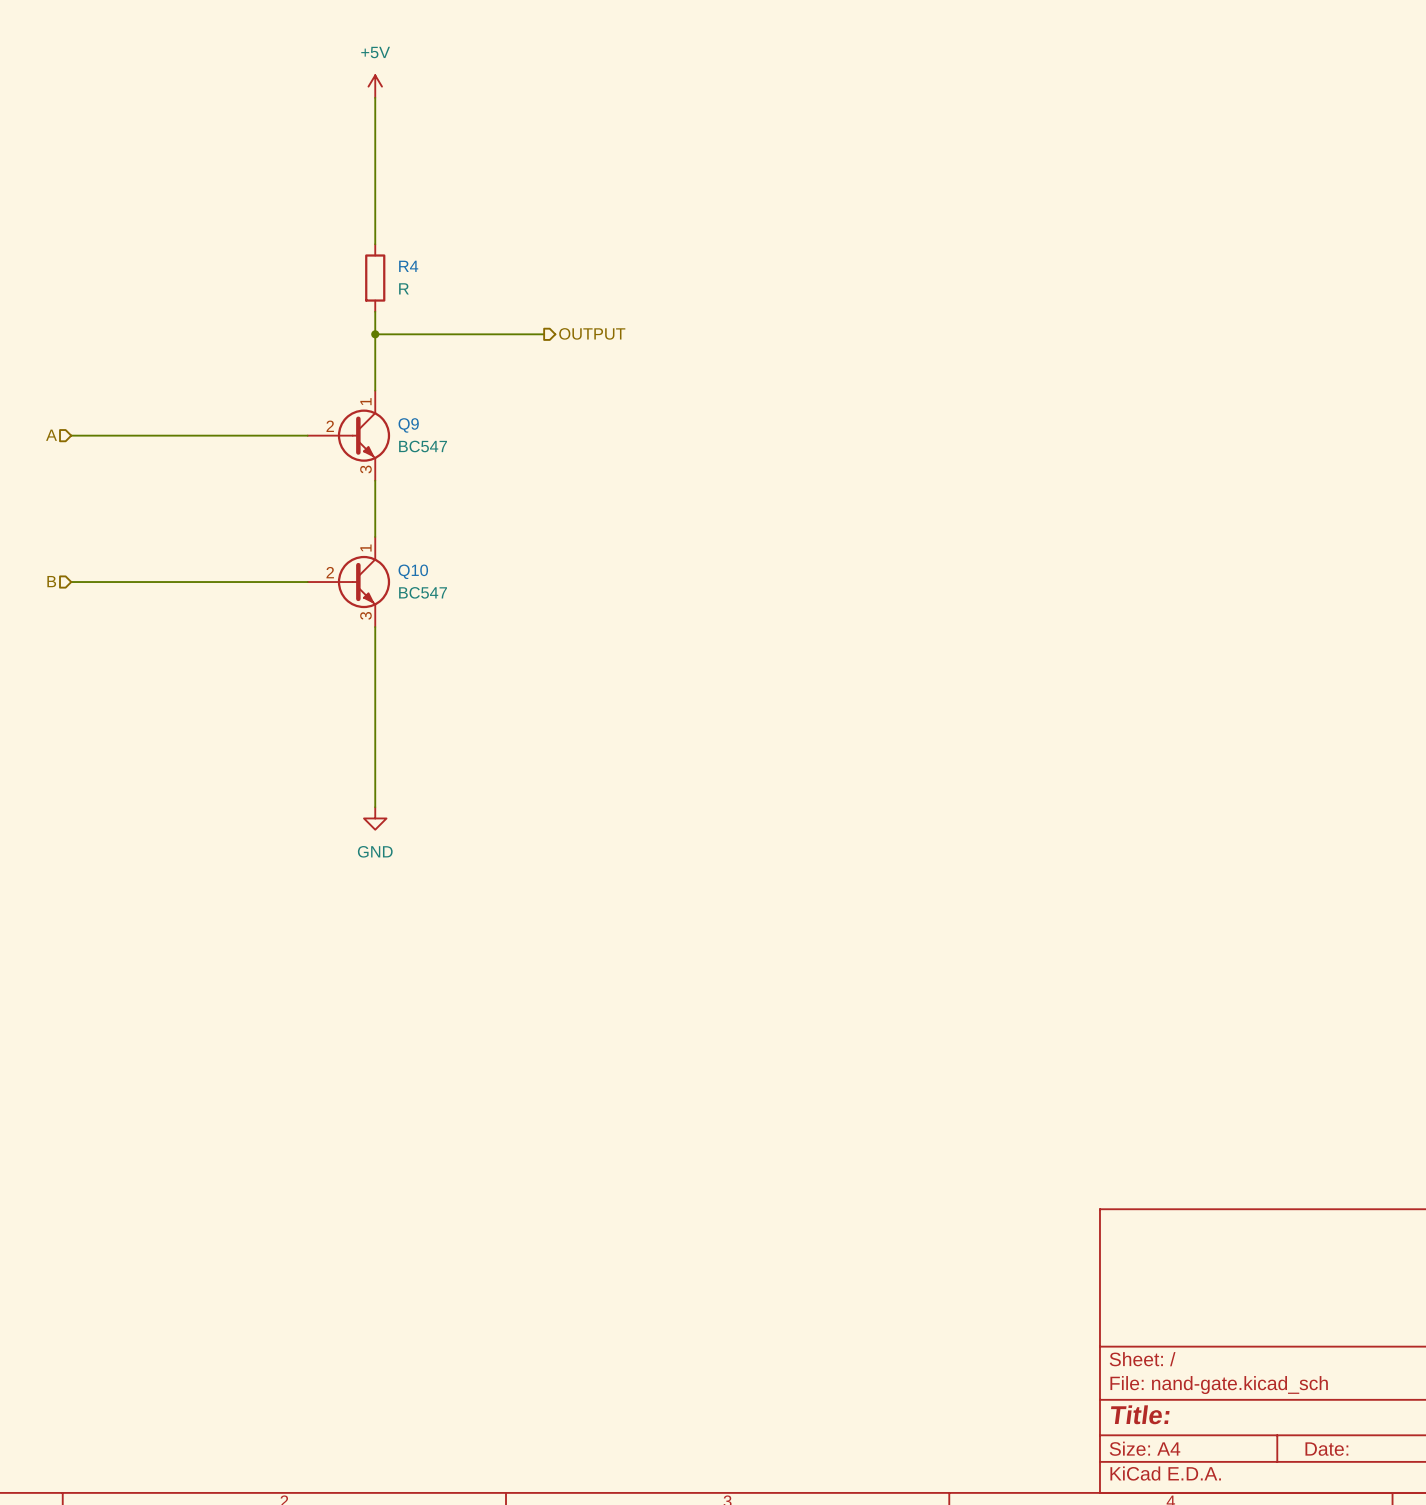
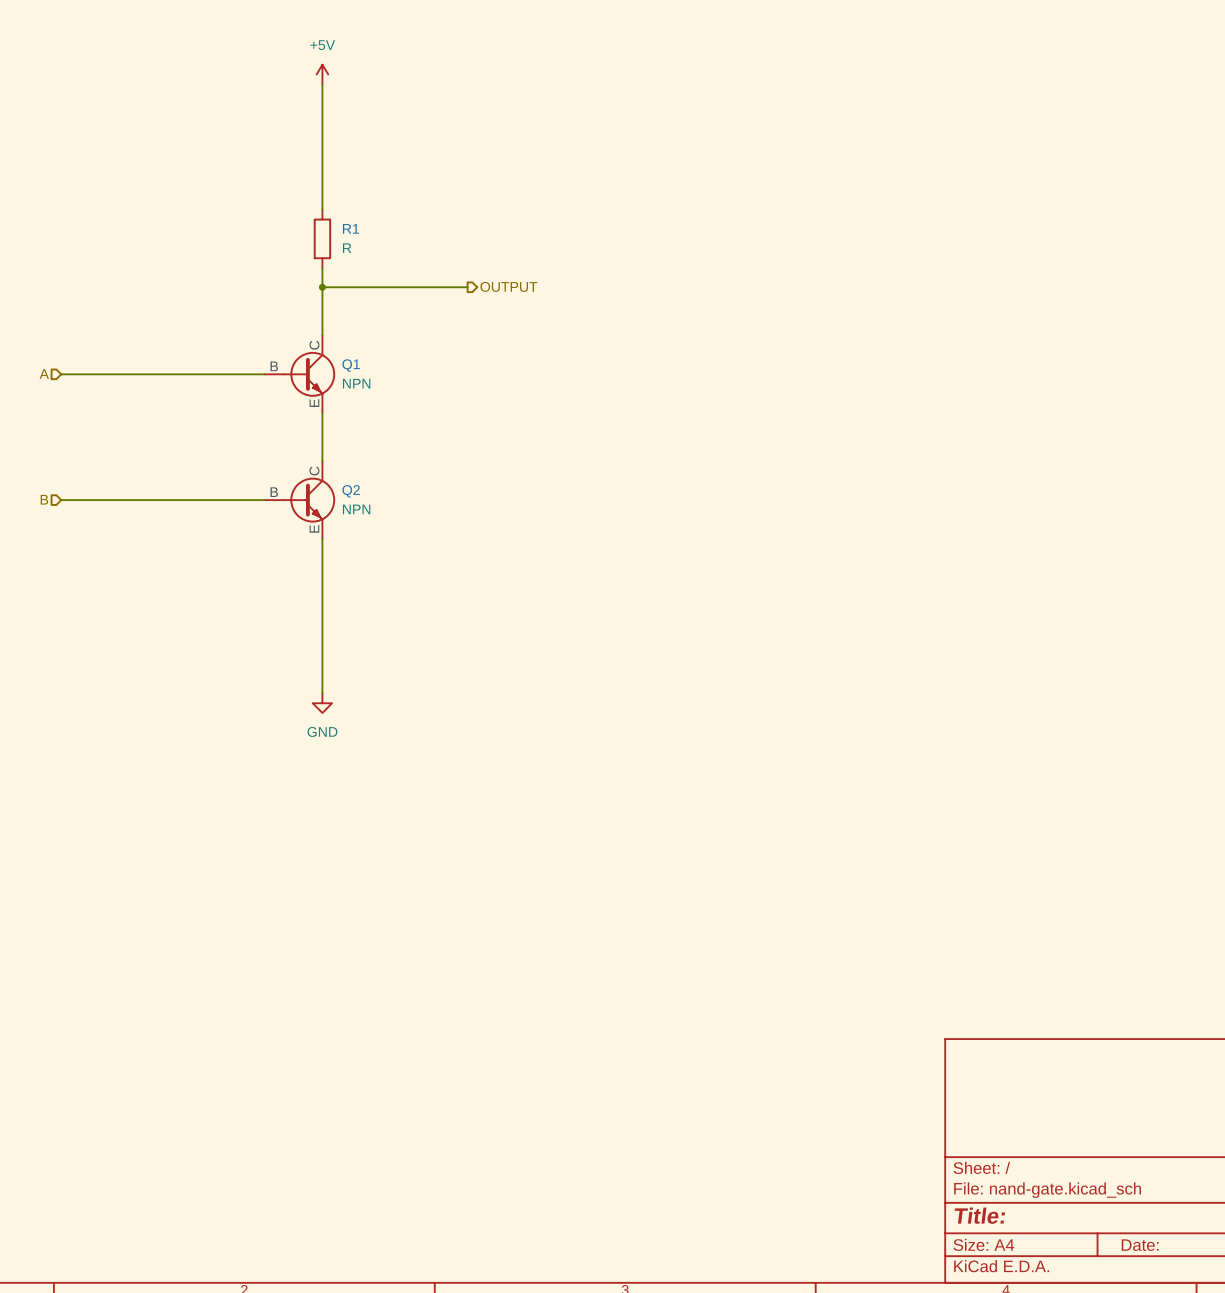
R4 name: R4 (408, 266) -> R1 (351, 228)
Q9: BC547 (348, 435) -> none
Q1: none -> NPN (299, 374)
Q10: BC547 (348, 582) -> none
Q2: none -> NPN (299, 500)

